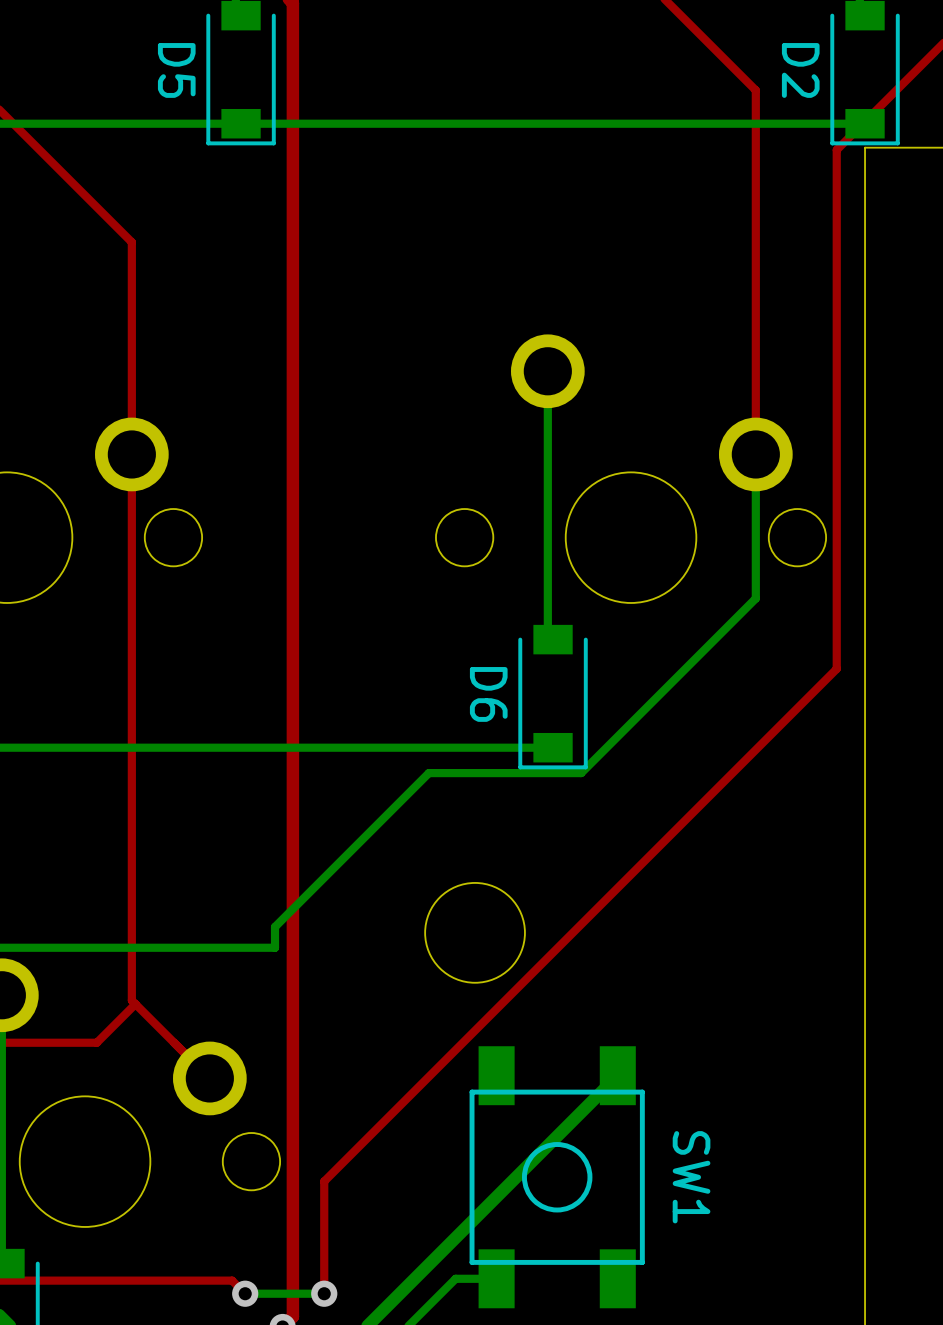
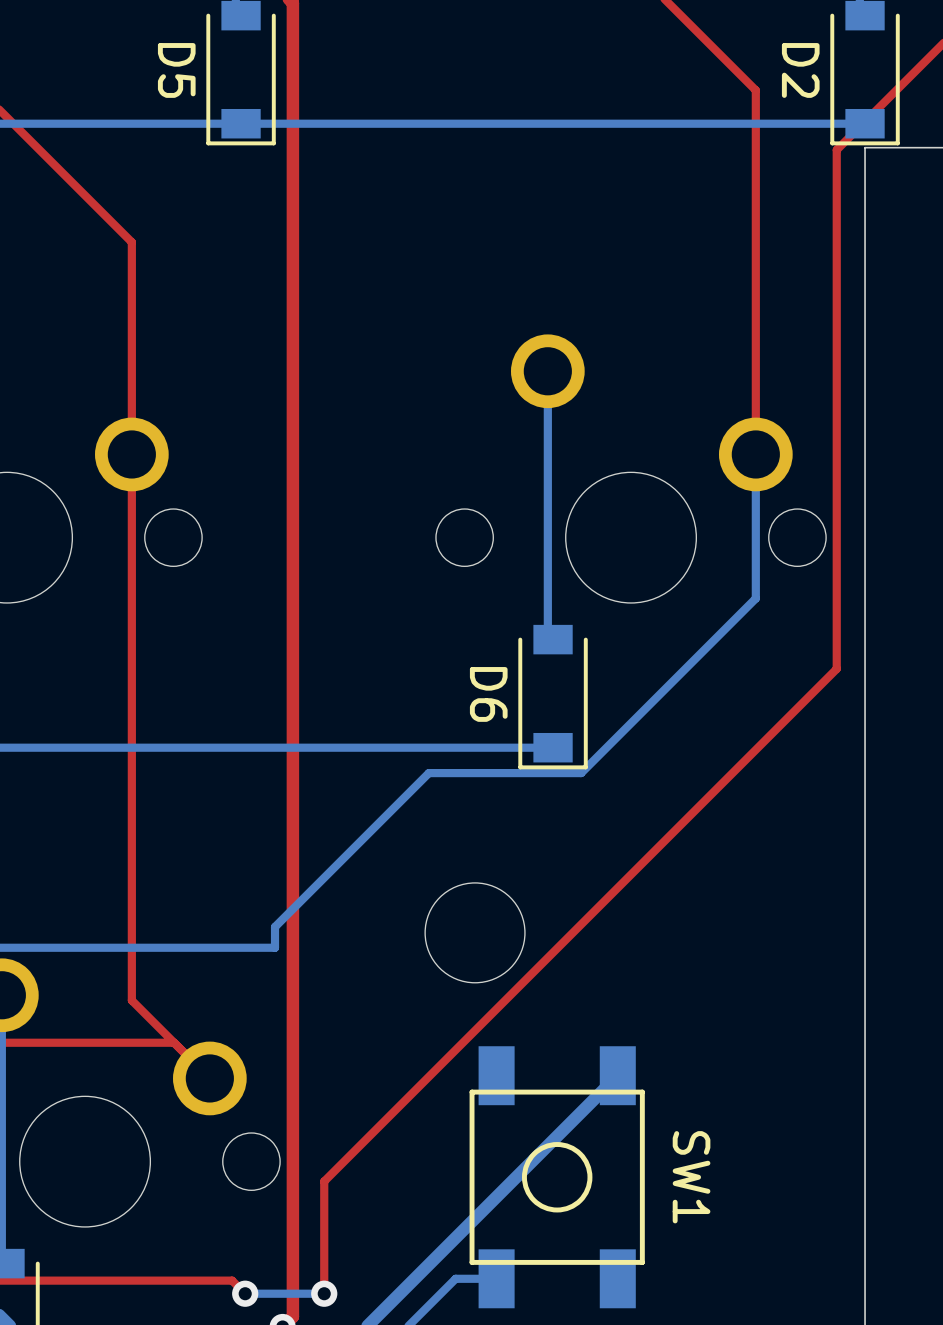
top track: (135, 1004) (96, 1042) -> (174, 1042) (96, 1042)

